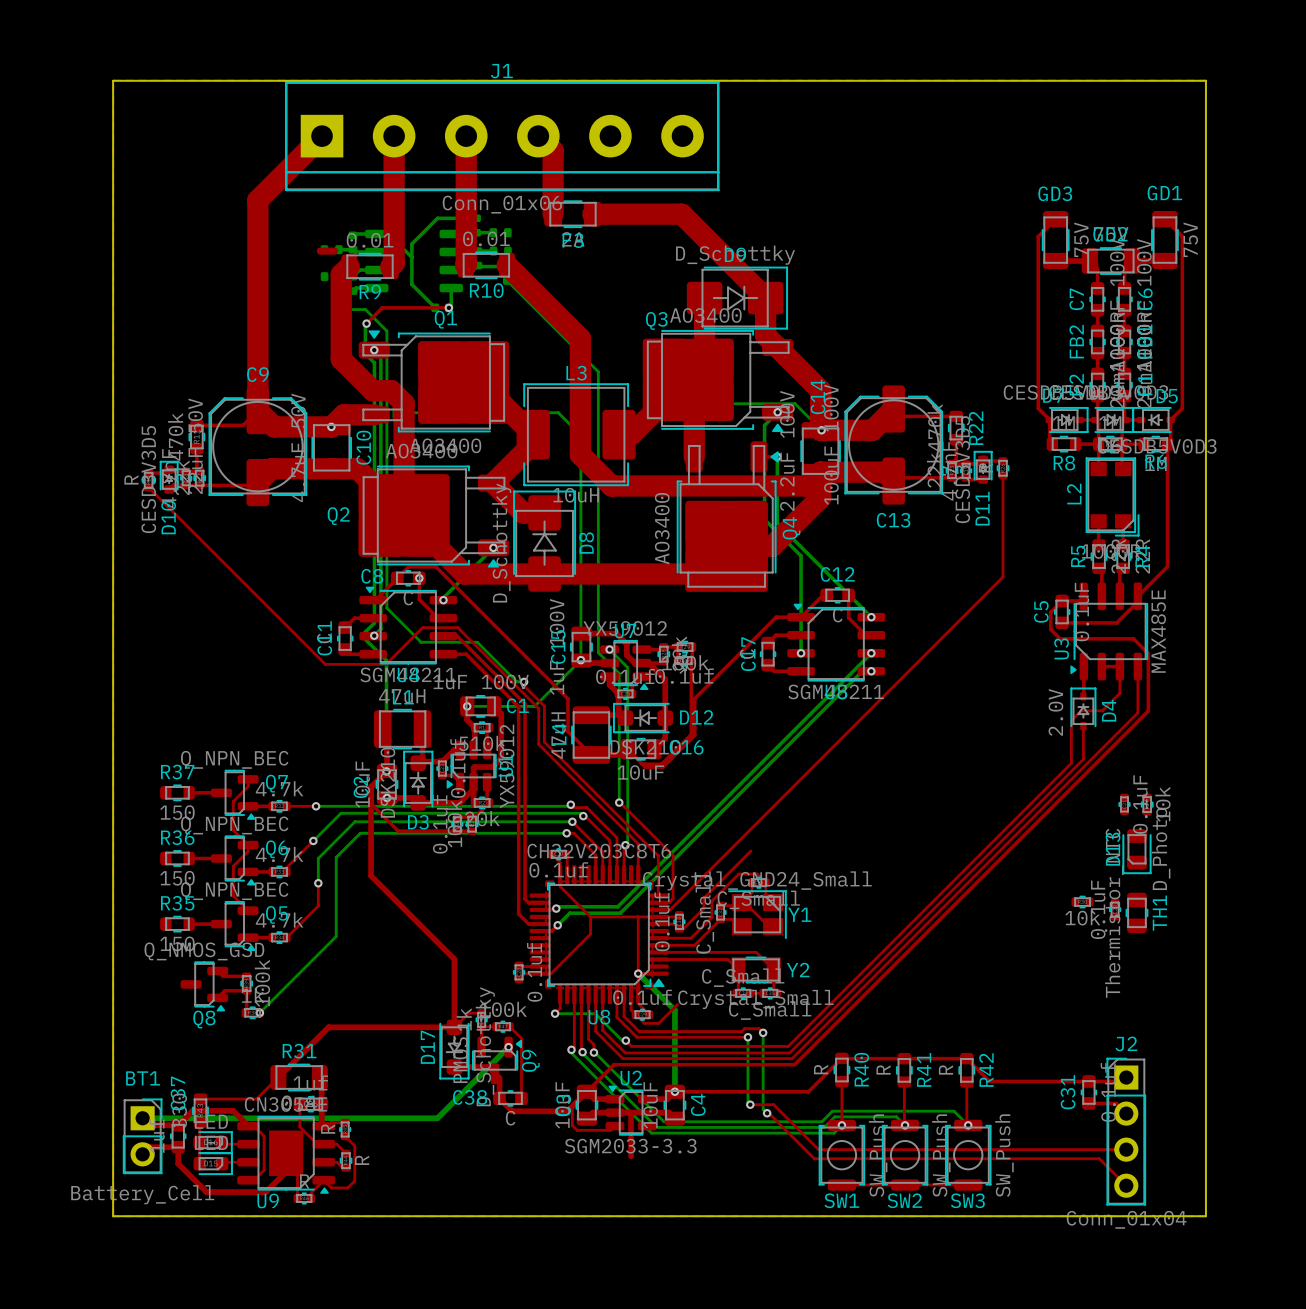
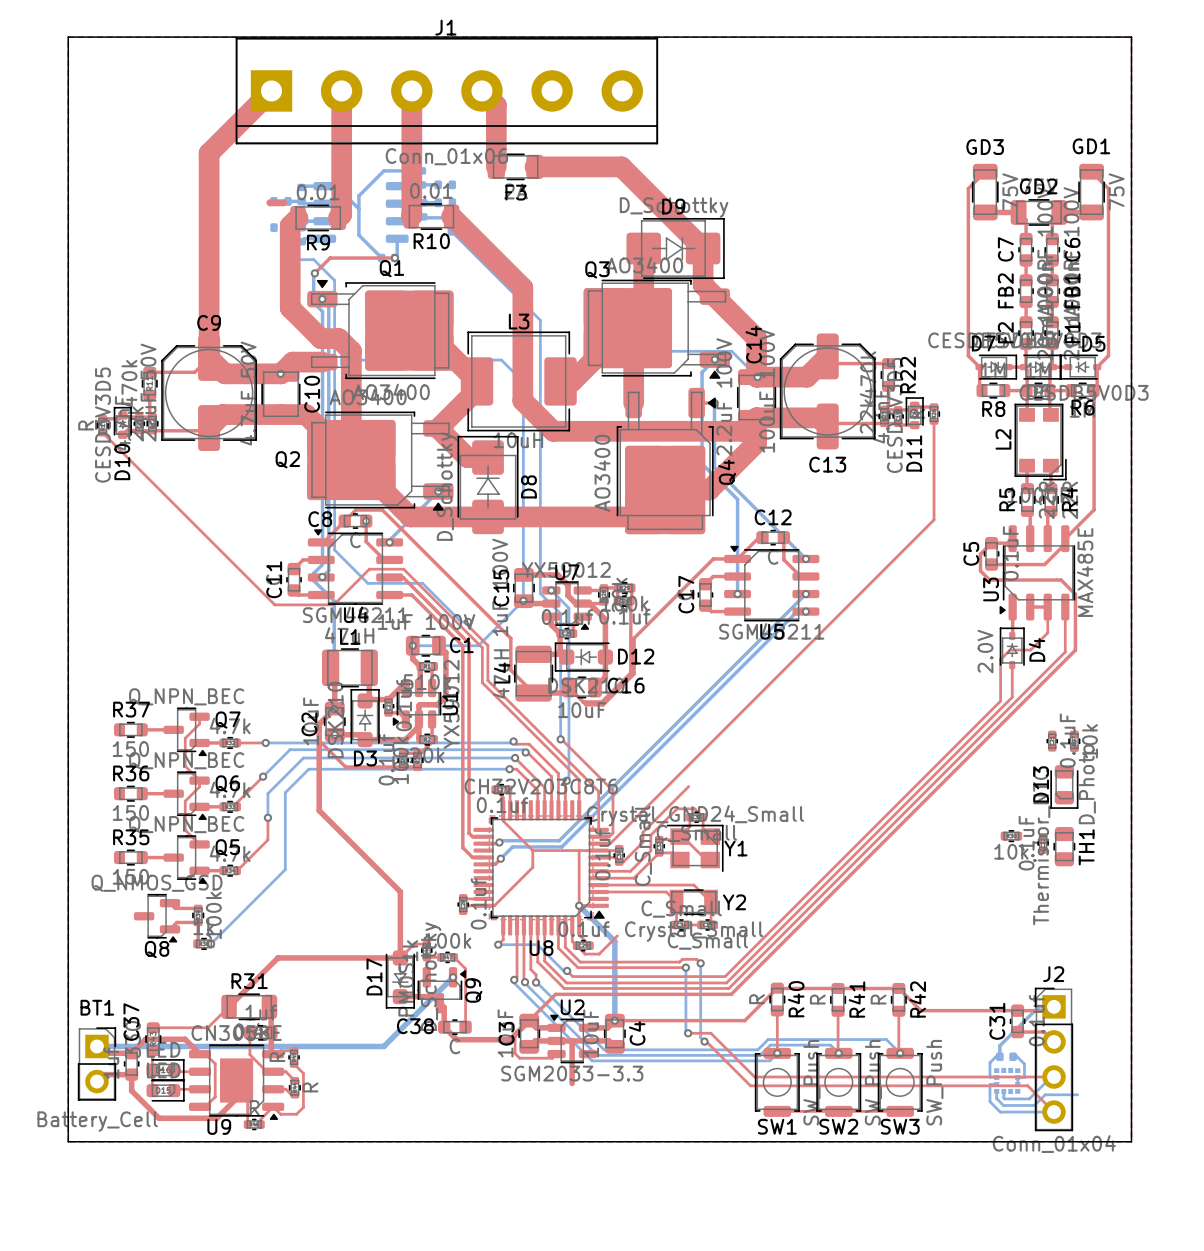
bottom track: none -> (1054, 1006) (1038, 1006) (999, 1045) (999, 1056) (995, 1056) (989, 1062) (989, 1077) (996, 1077)
part: none -> (1006, 1056)
bottom track: none -> (1013, 1056) (1017, 1056) (1024, 1064) (1024, 1077) (1017, 1077) (1017, 1084)
bottom track: none -> (1054, 1076) (1051, 1076) (1029, 1098) (1004, 1098) (1003, 1091)
part: none -> (1007, 1080)
bottom track: none -> (996, 1084) (989, 1084) (989, 1101) (1000, 1112) (1054, 1112)
bottom track: none -> (996, 1091) (996, 1098) (1003, 1105) (1034, 1105) (1045, 1094) (1077, 1094)

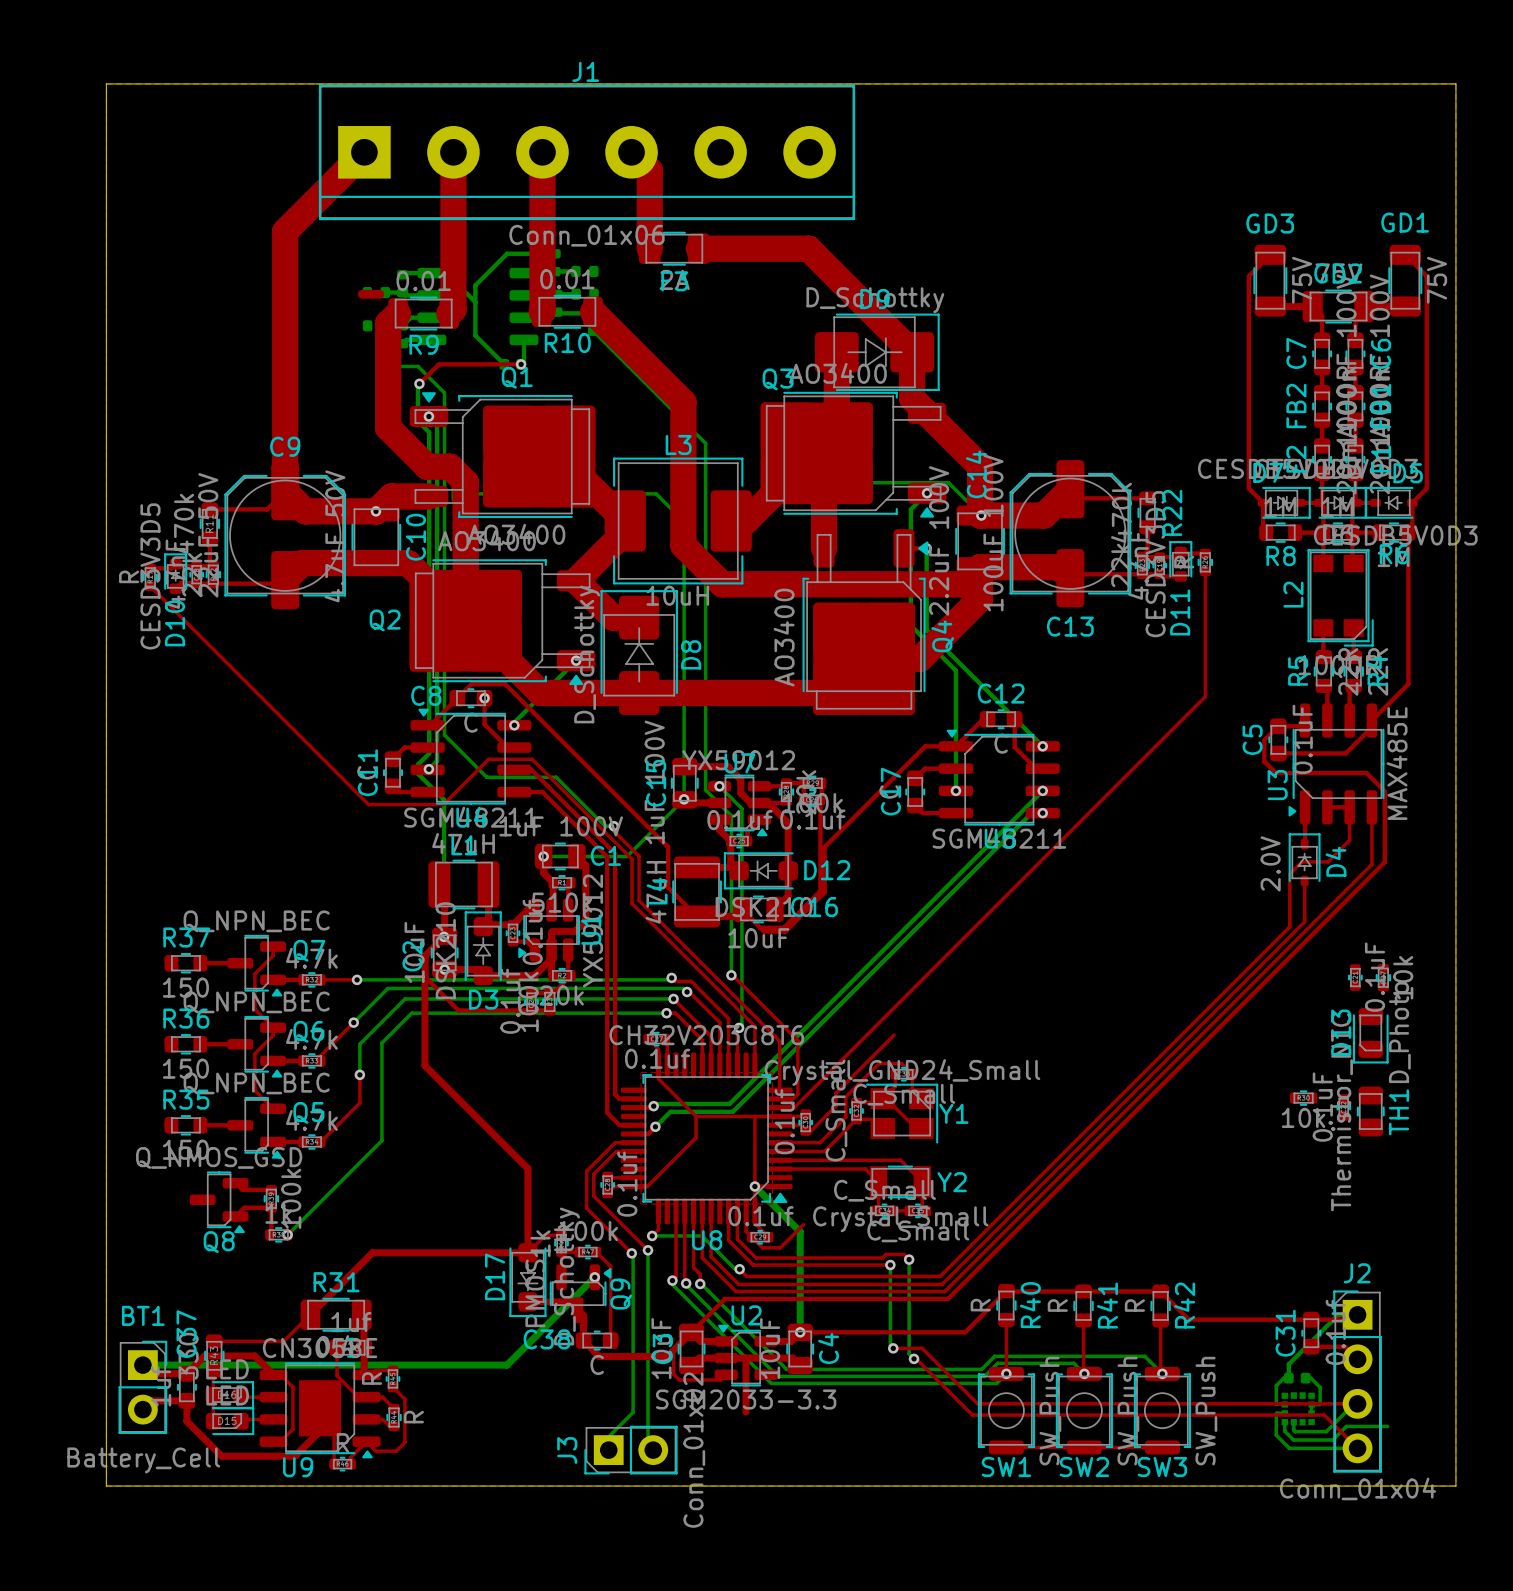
top track: none -> (633, 1142) (615, 1142) (586, 1171) (586, 1208) (631, 1253)
top track: none -> (633, 1151) (616, 1151) (593, 1174) (593, 1195) (647, 1250)
bottom track: none -> (647, 1250) (647, 1444) (653, 1450)
via: none -> (647, 1250)
bottom track: none -> (631, 1253) (633, 1412) (608, 1436) (608, 1450)
via: none -> (631, 1253)
J3: none -> Conn_01x02 (630, 1450)

